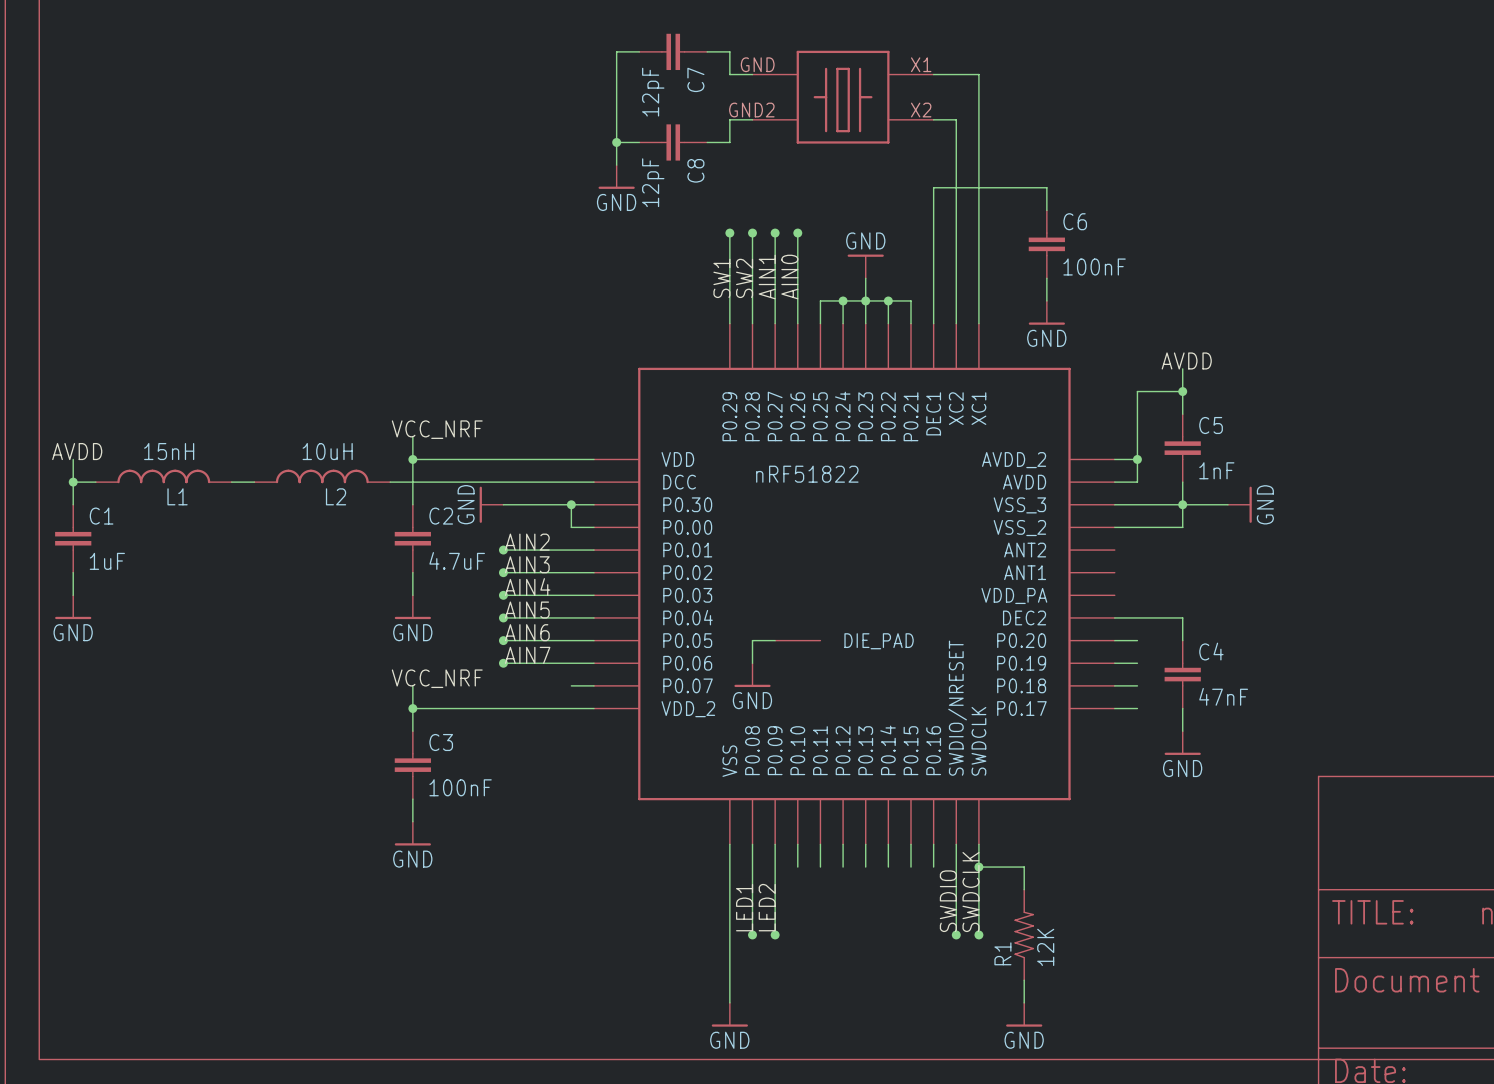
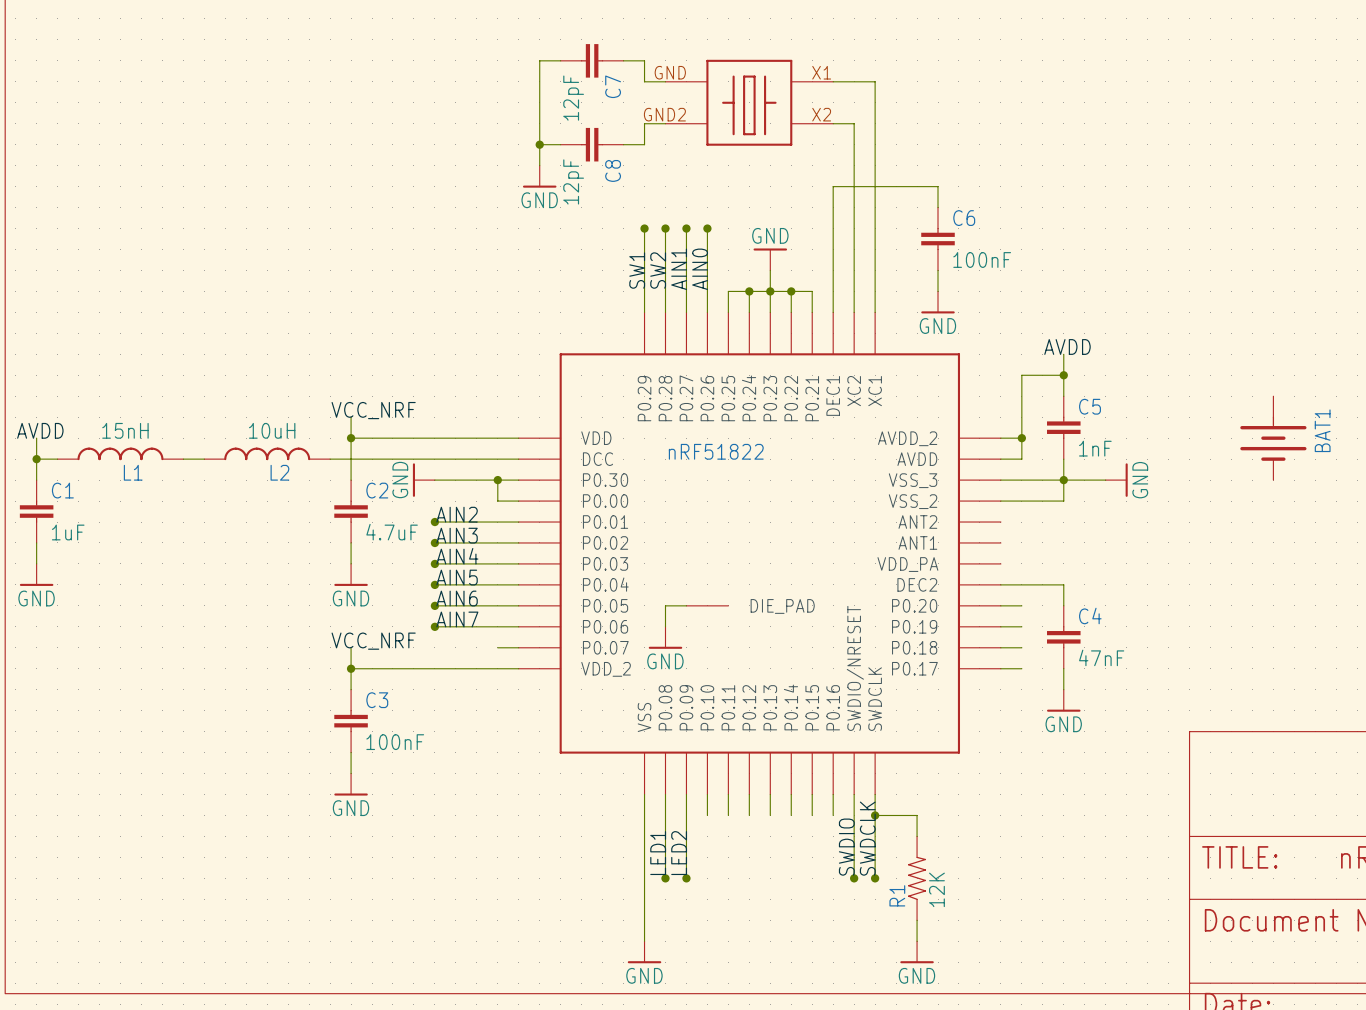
BAT1: none -> (1273, 438)

